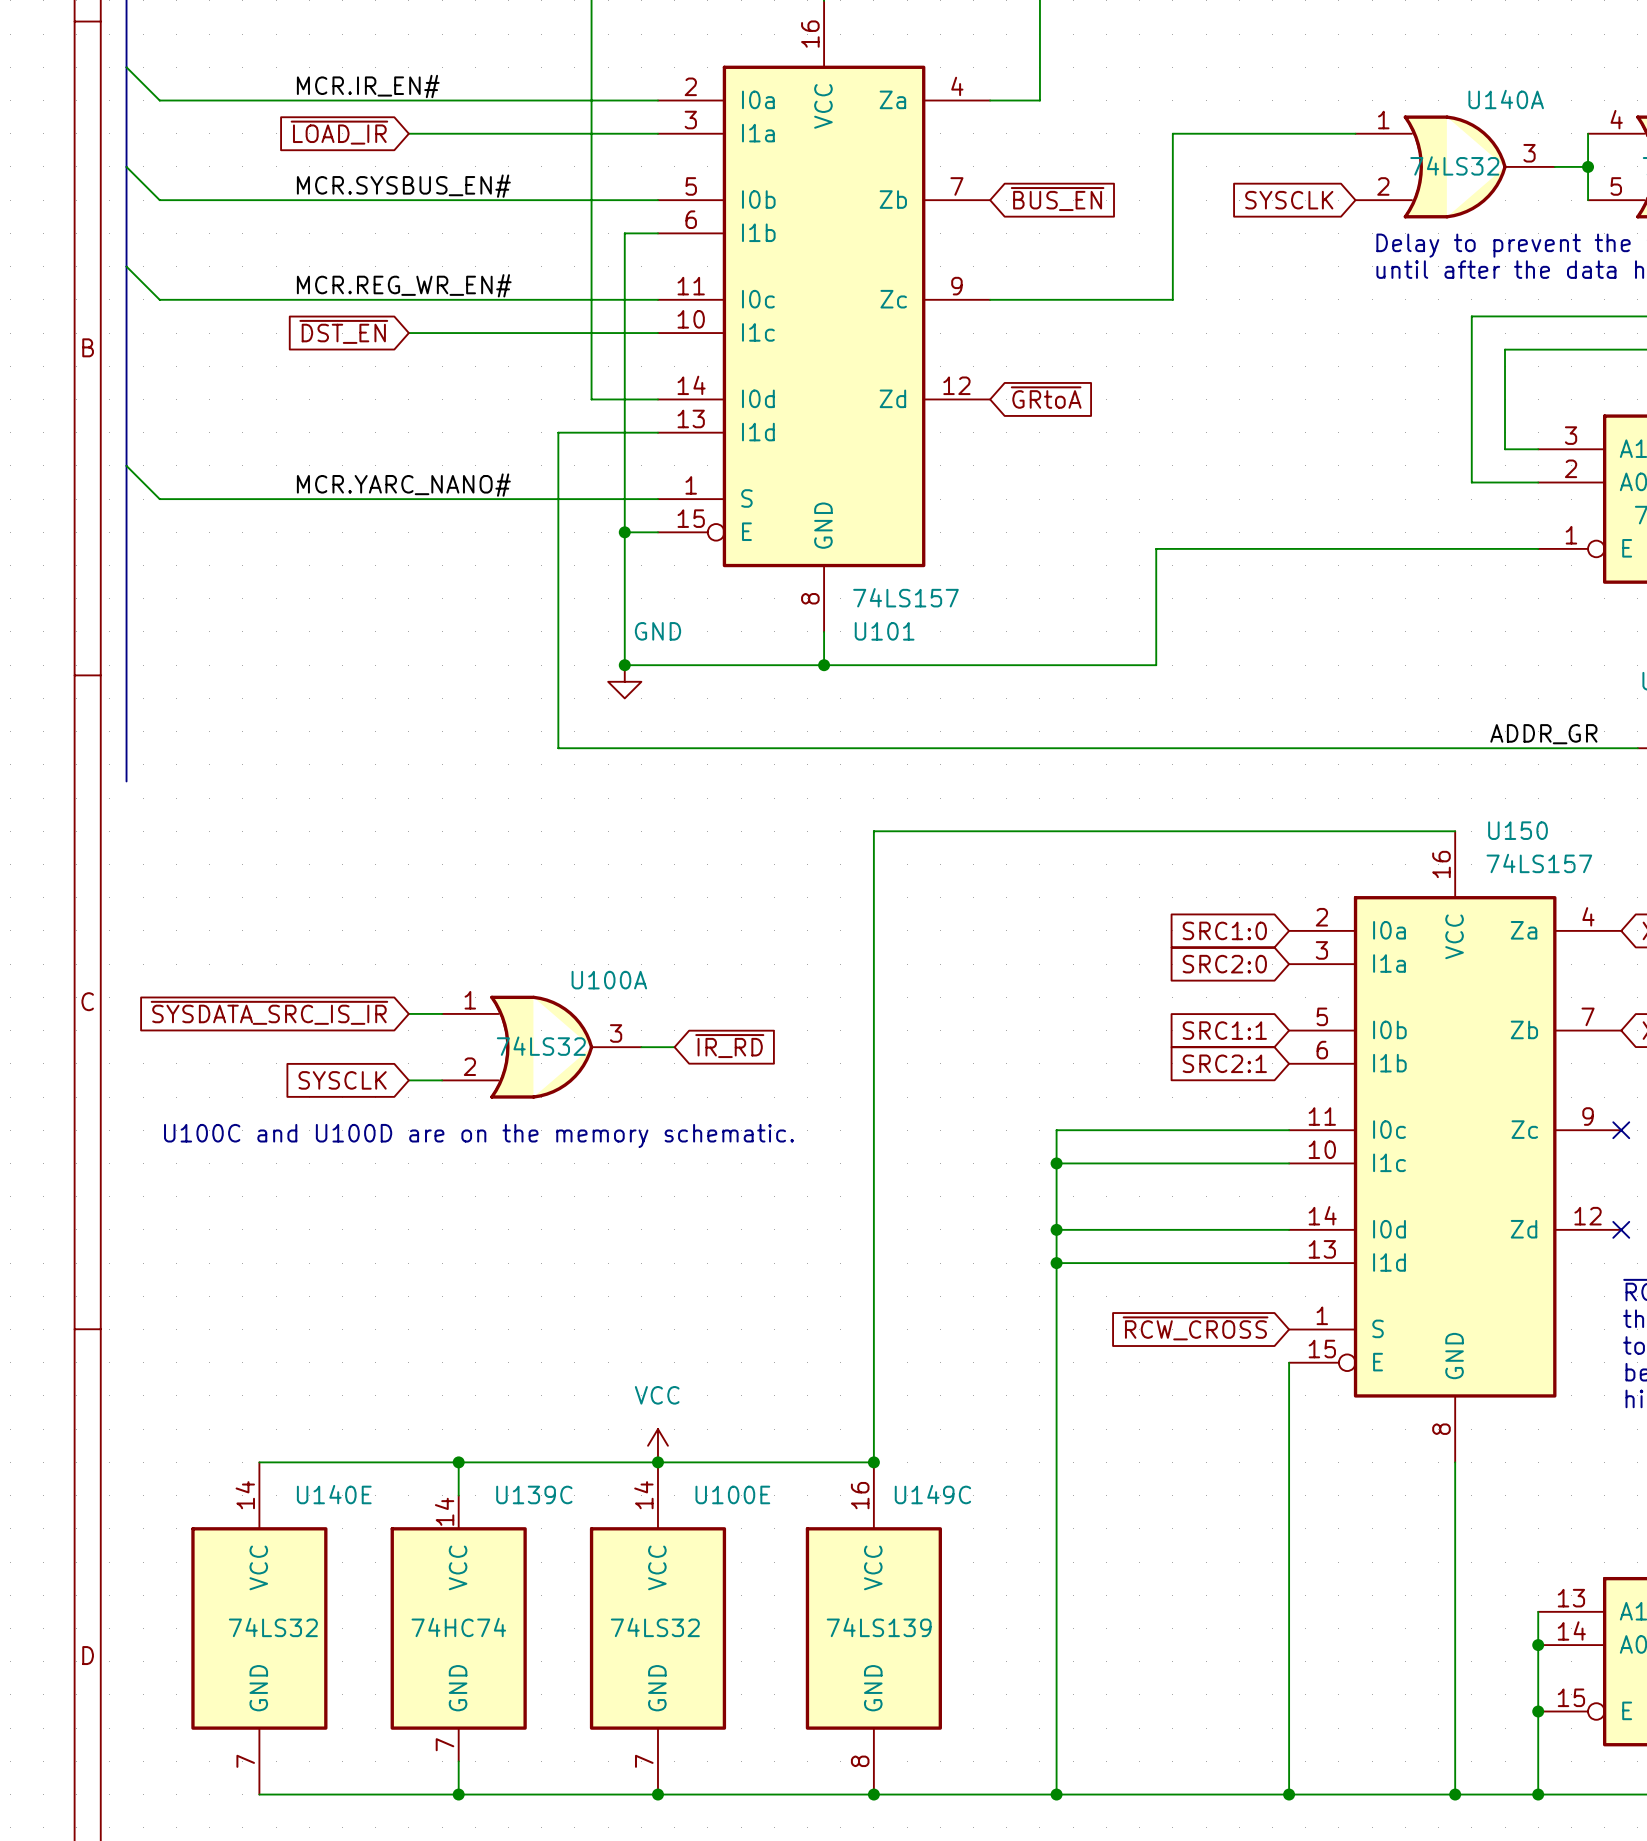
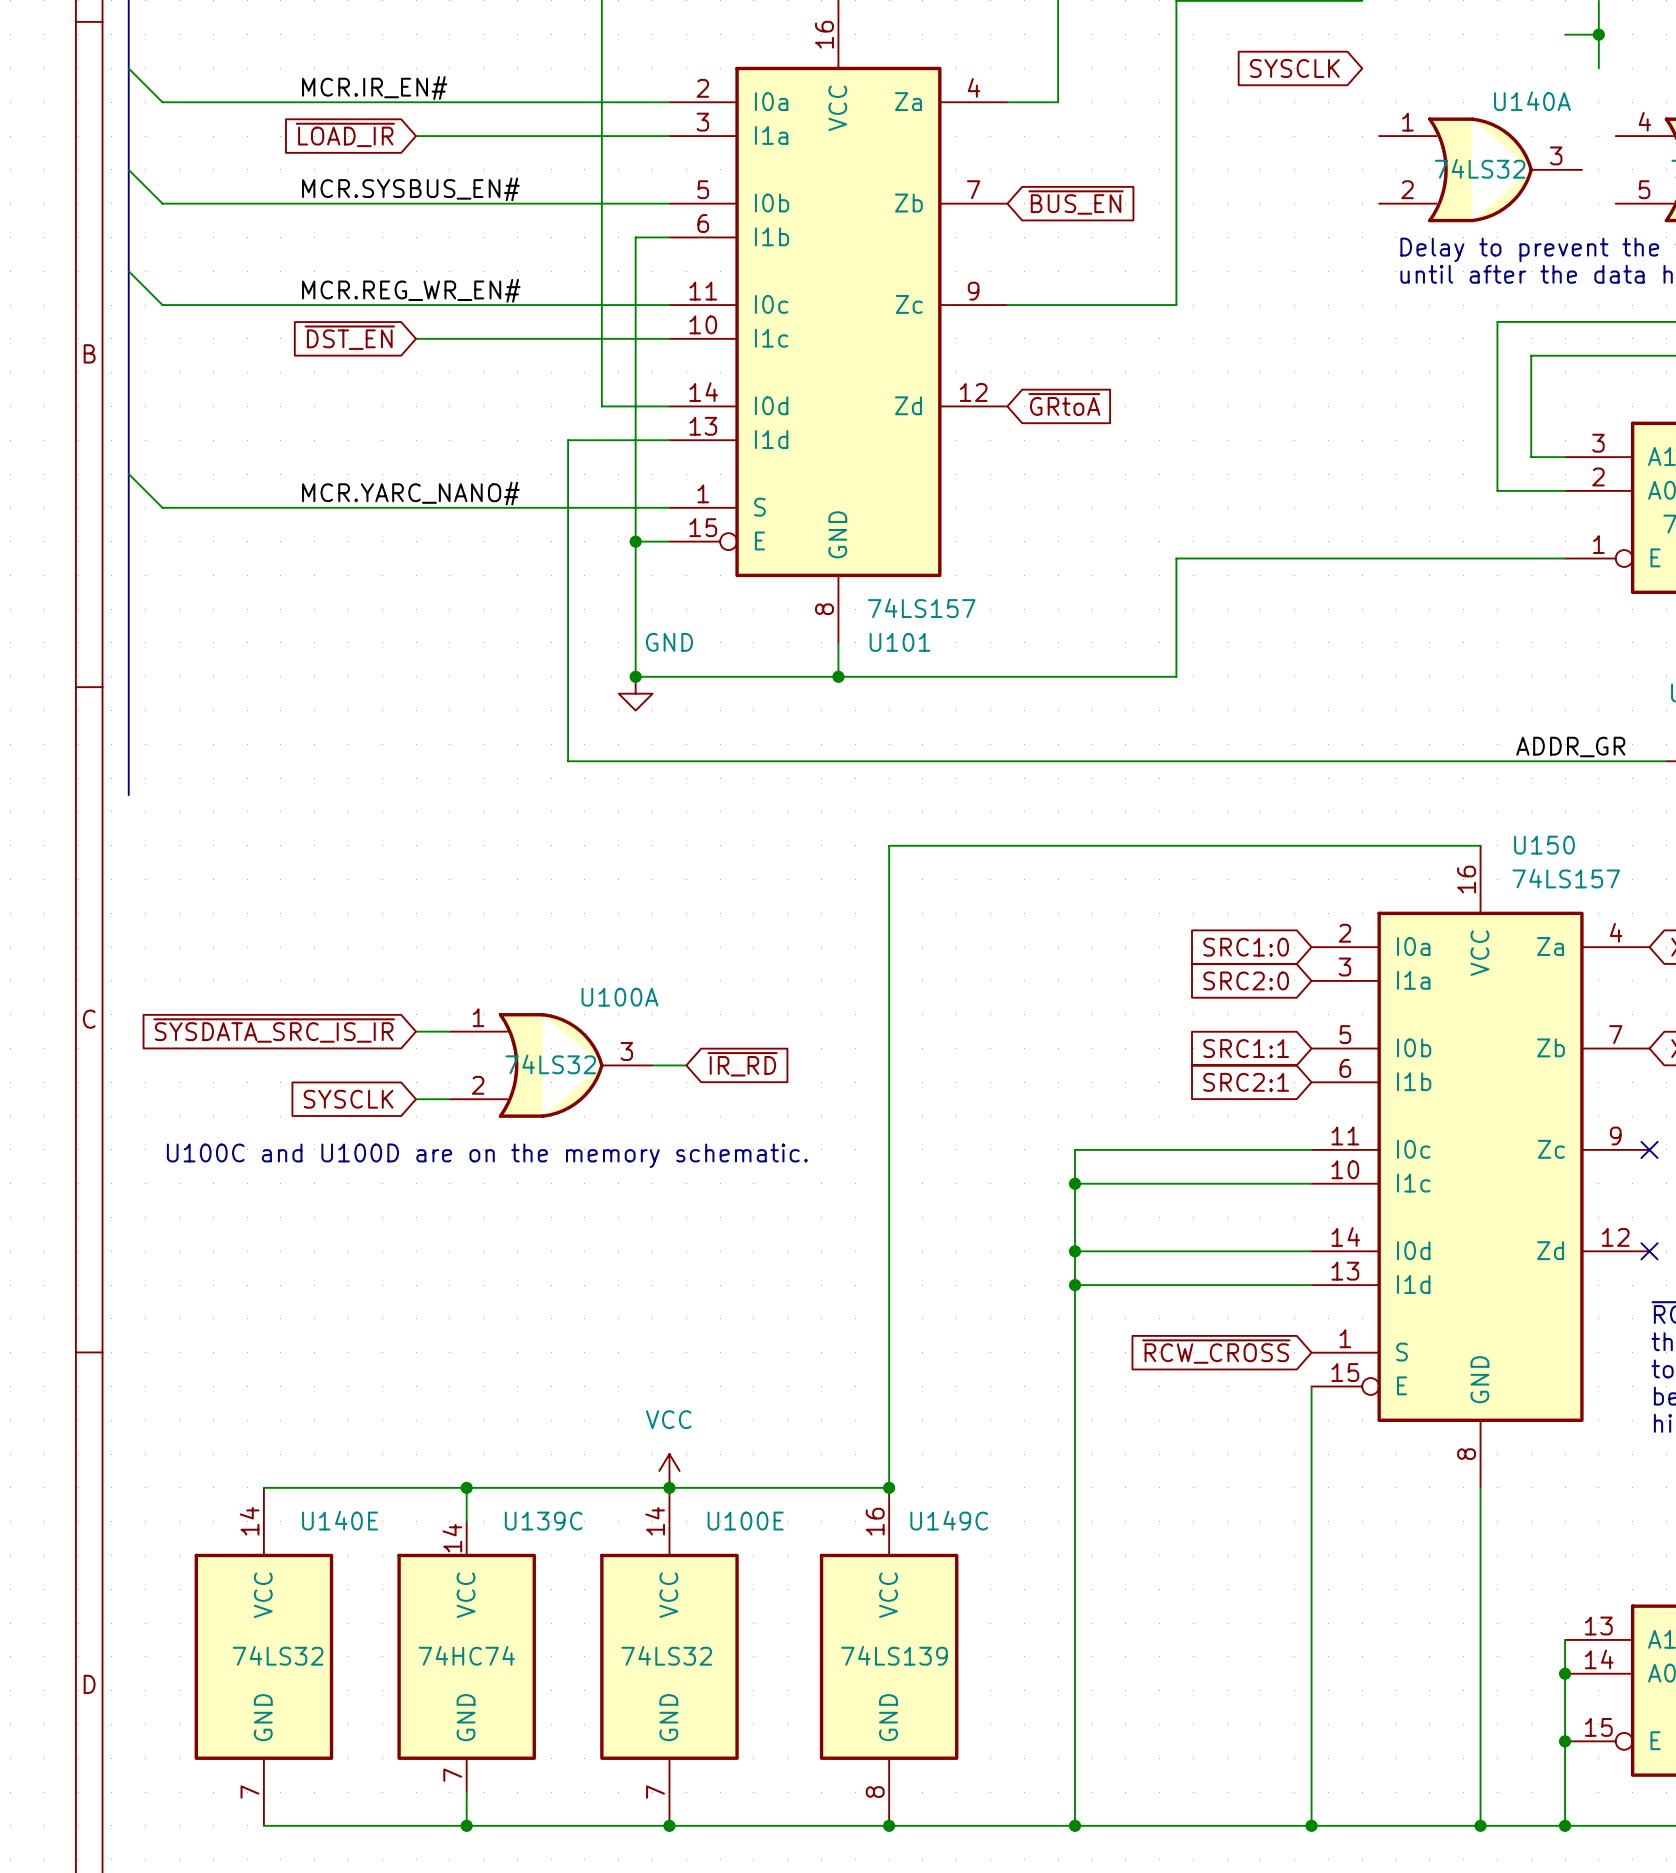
junction: none -> (1598, 34)
wire: (1355, 133) (1172, 133) (1172, 299) (1156, 299) -> (1362, 0) (1176, 0) (1176, 305)
wire: (1588, 133) (1588, 200) -> (1598, 0) (1598, 68)
wire: (1554, 166) (1588, 166) -> (1565, 34) (1598, 34)
junction: (1588, 166) -> none
global label position: SYSCLK (1289, 200) -> SYSCLK (1294, 68)

